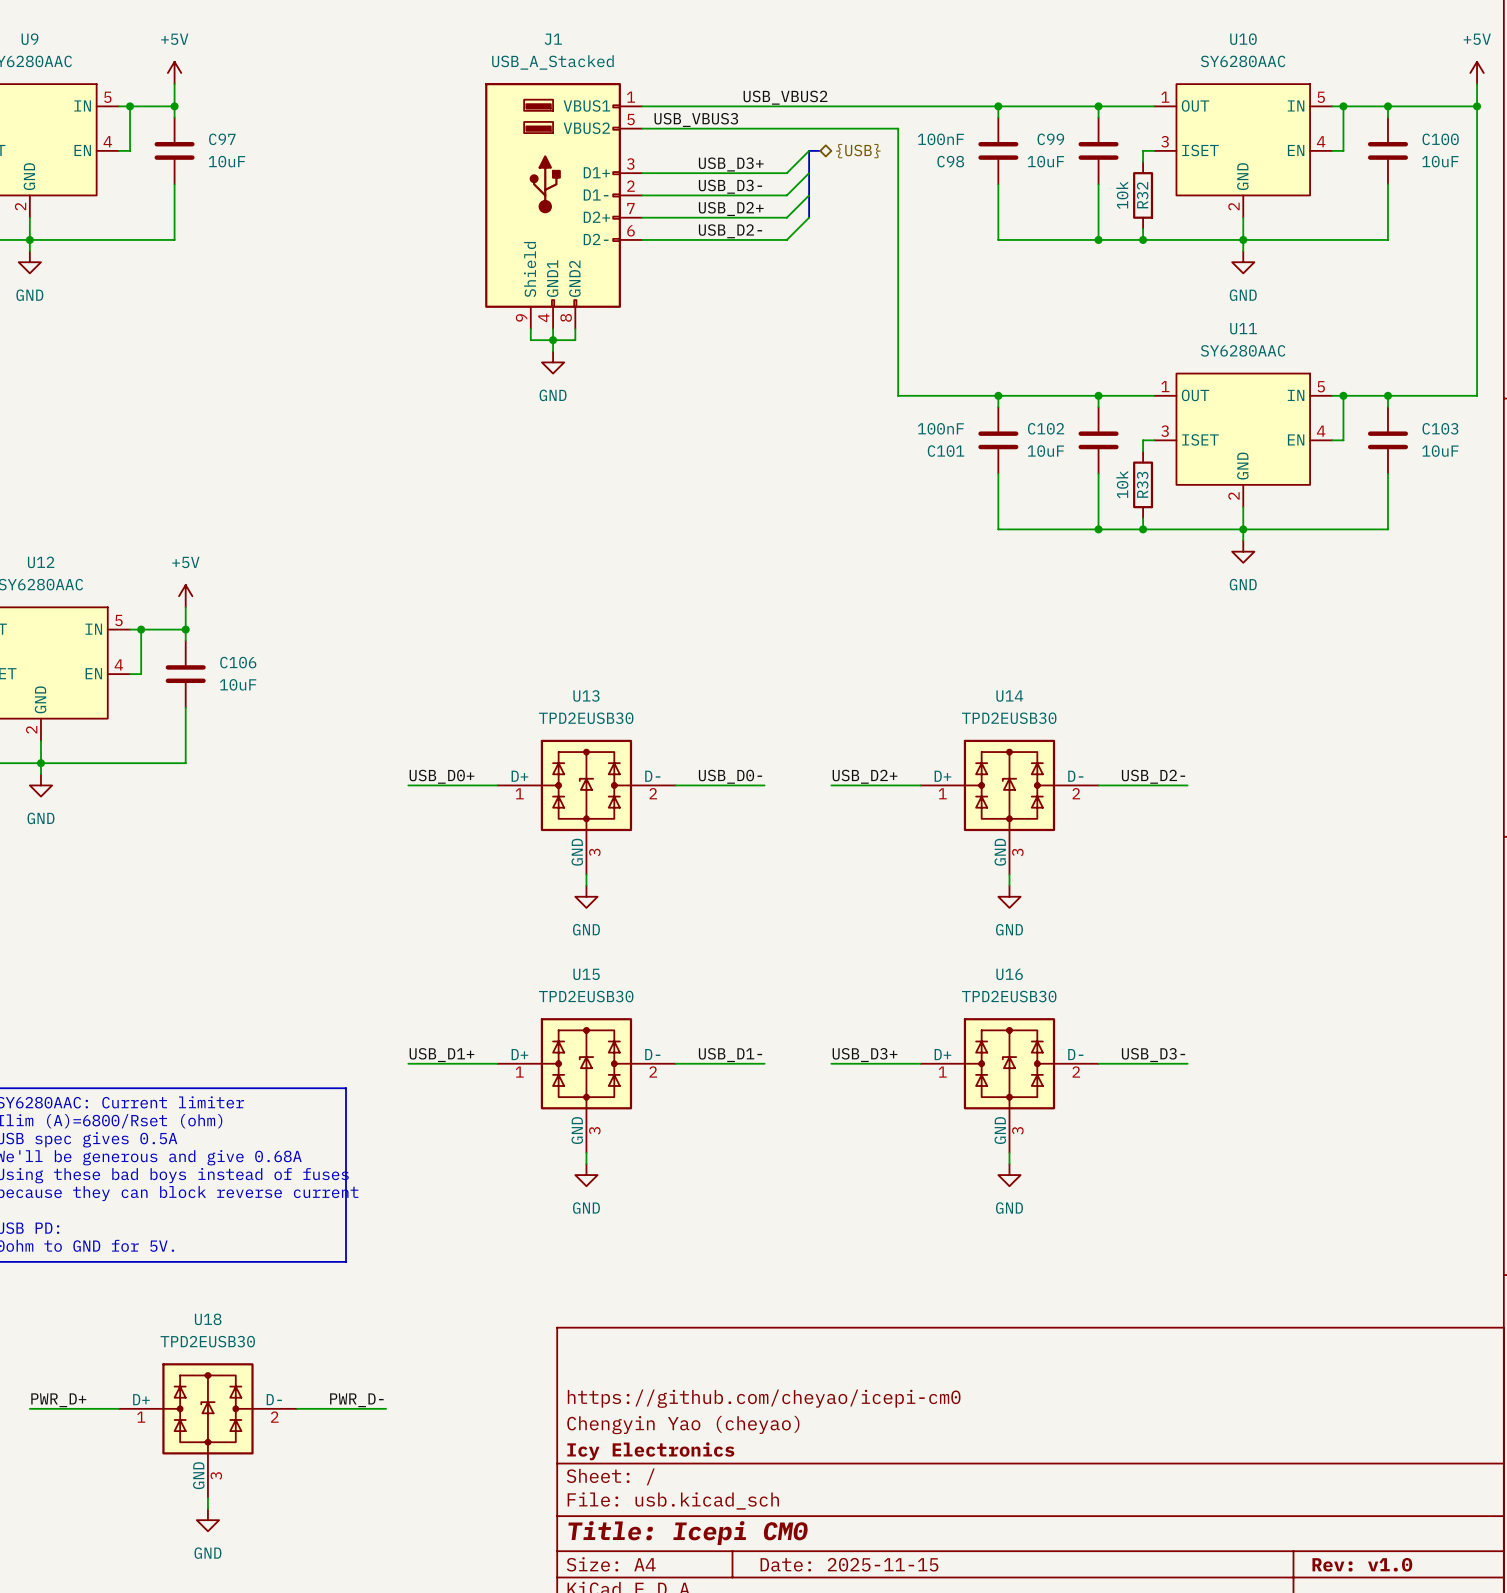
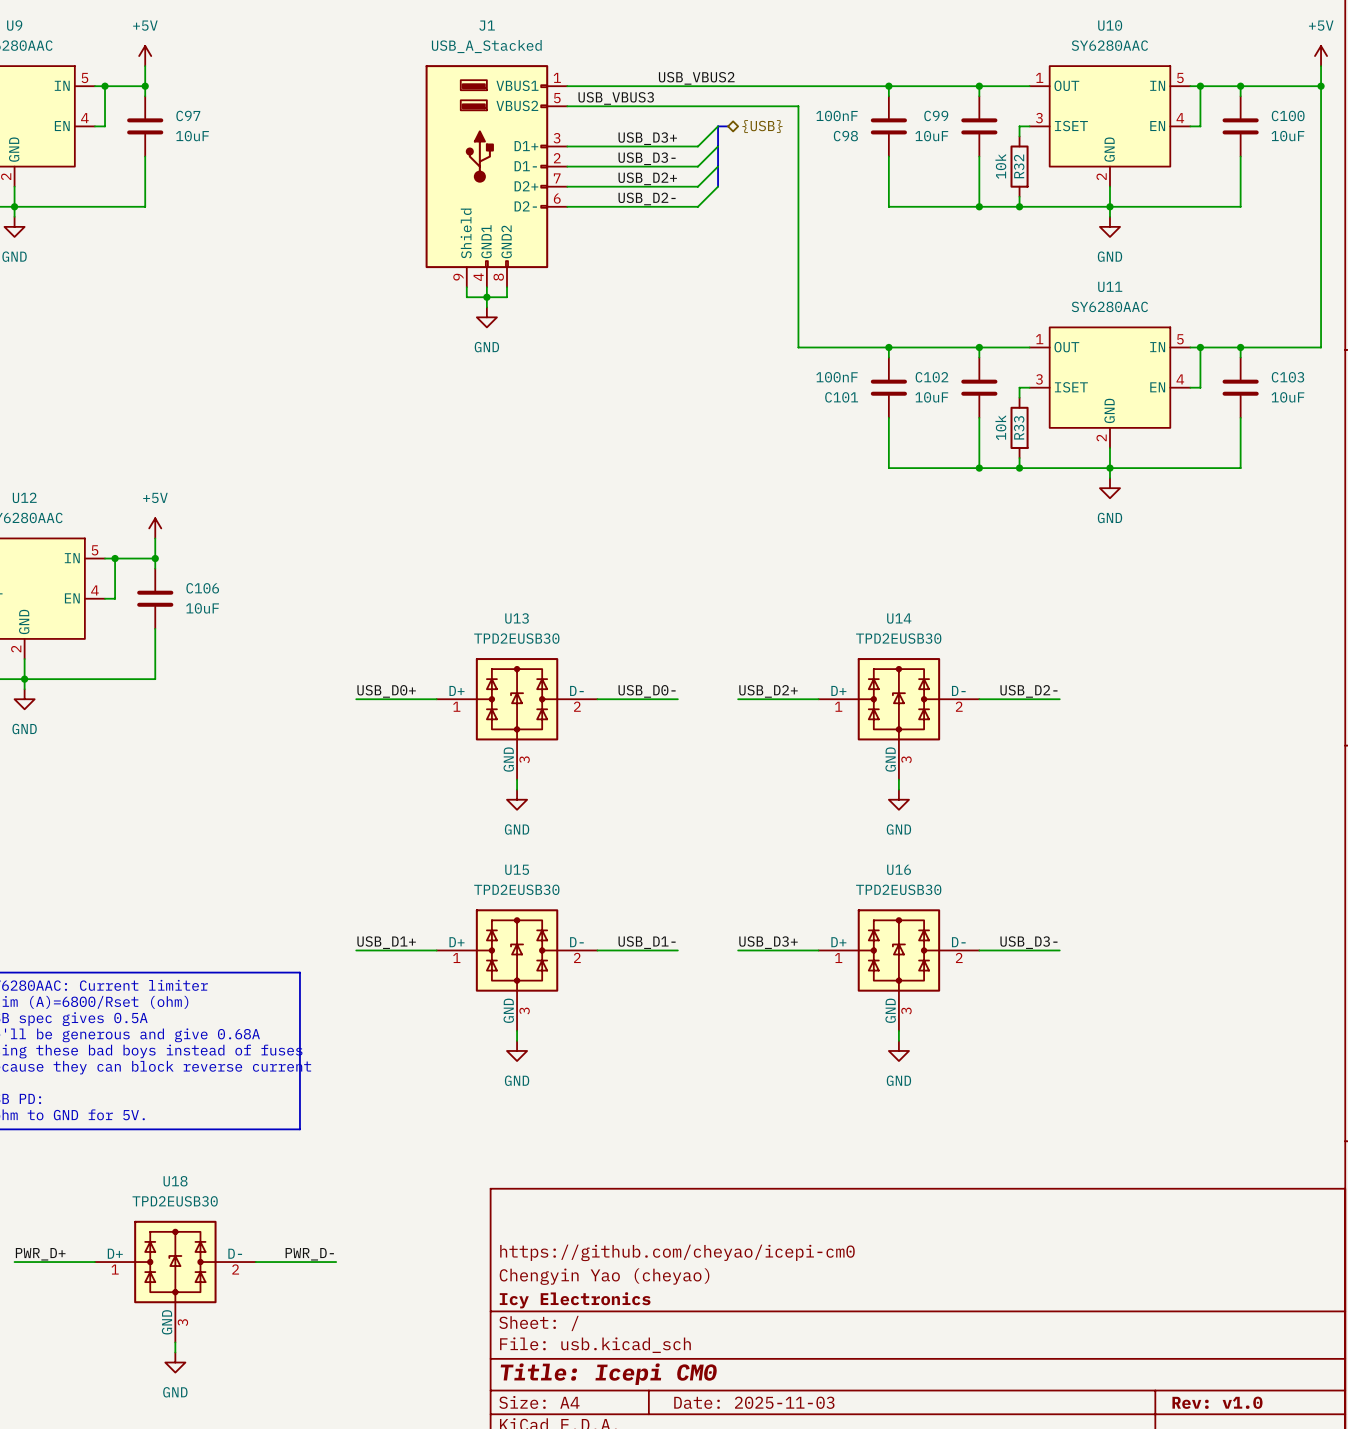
title block: Date: 2025-11-15 (849, 1564) -> Date: 2025-11-03 (754, 1402)

